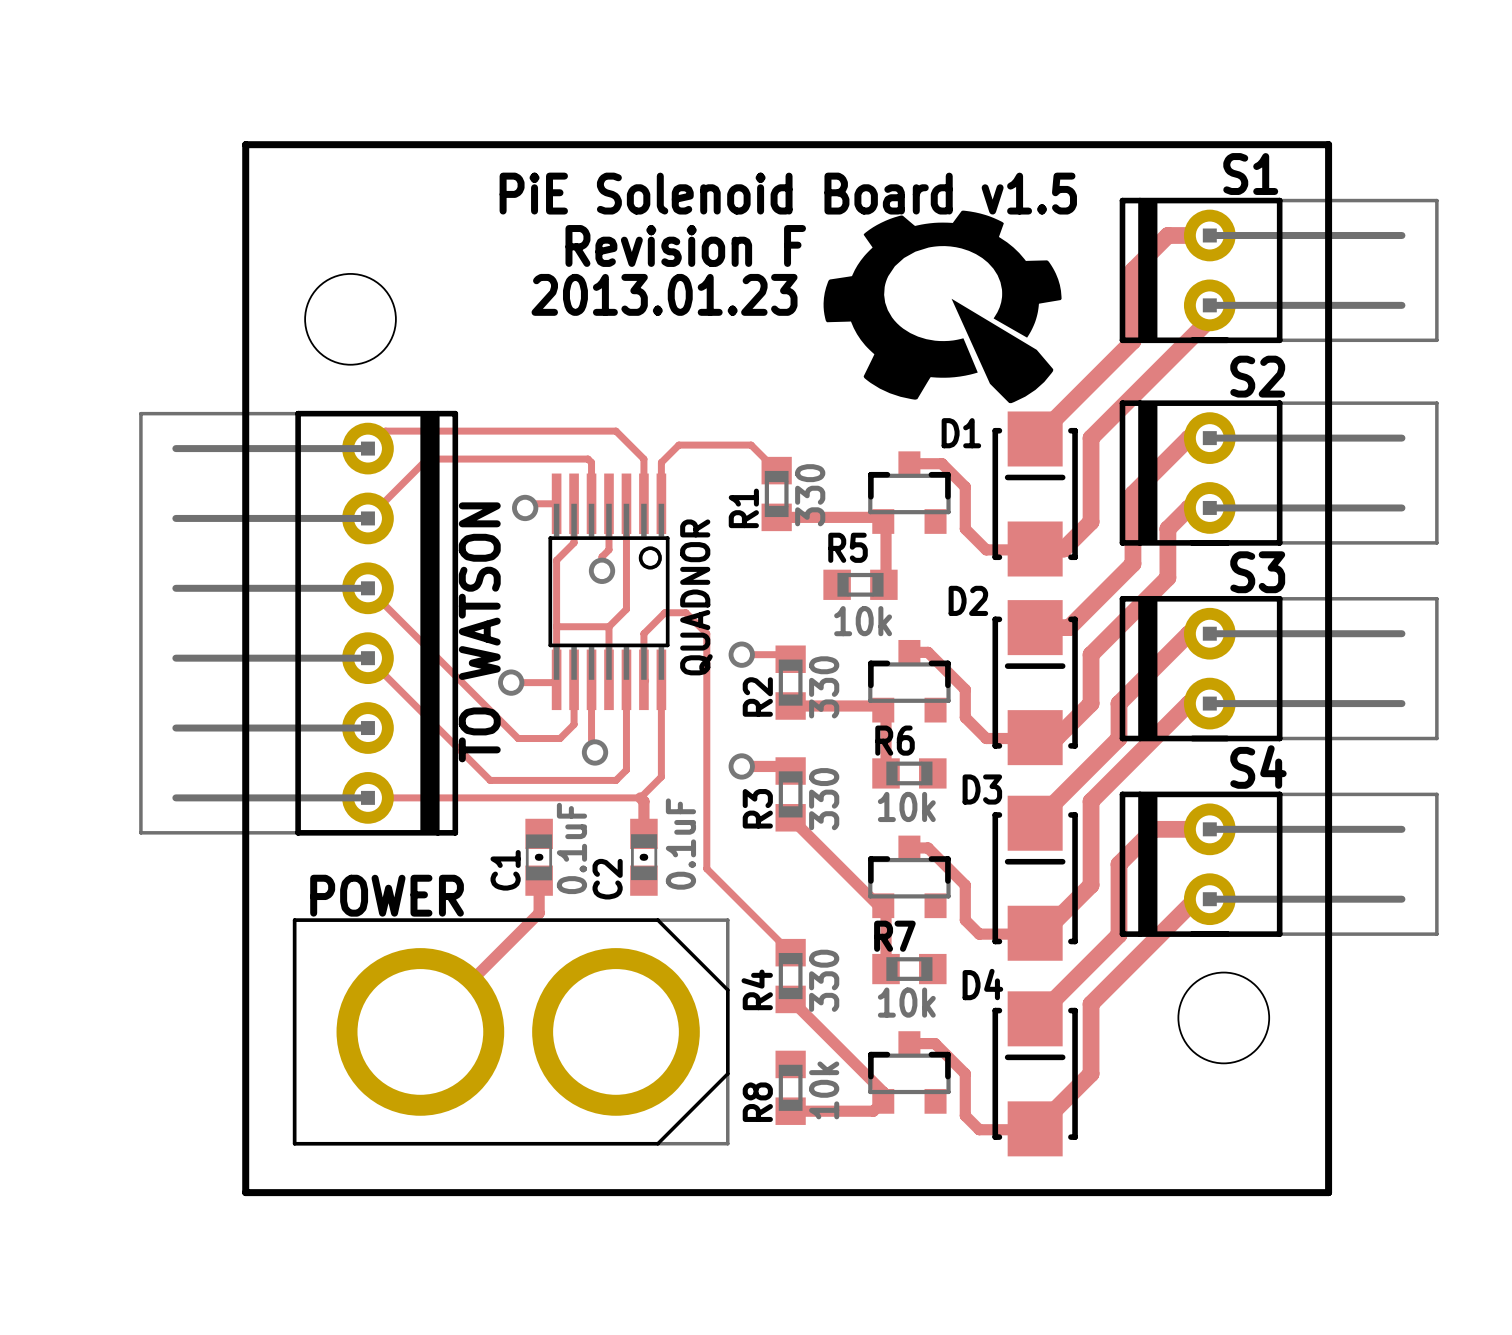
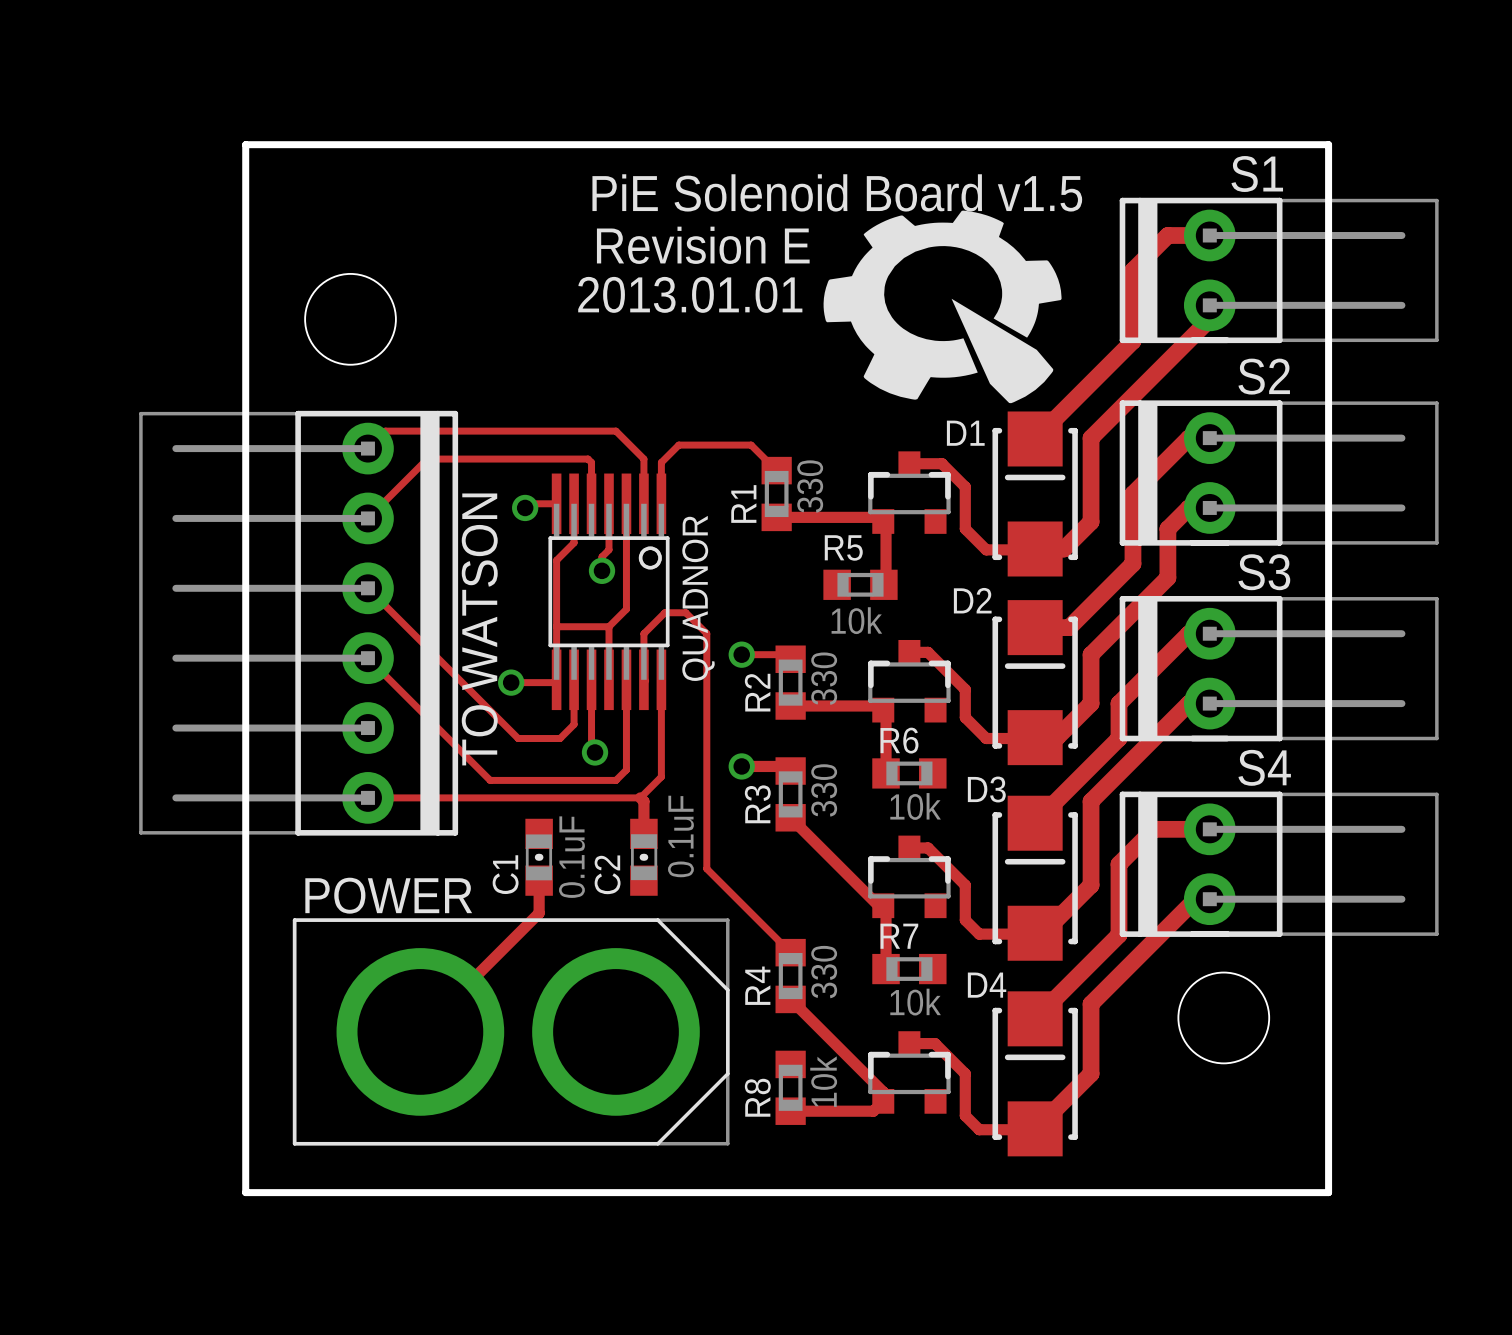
text: Revision F (685, 245) -> Revision E (703, 245)
text: 2013.01.23 (664, 294) -> 2013.01.01 (690, 294)

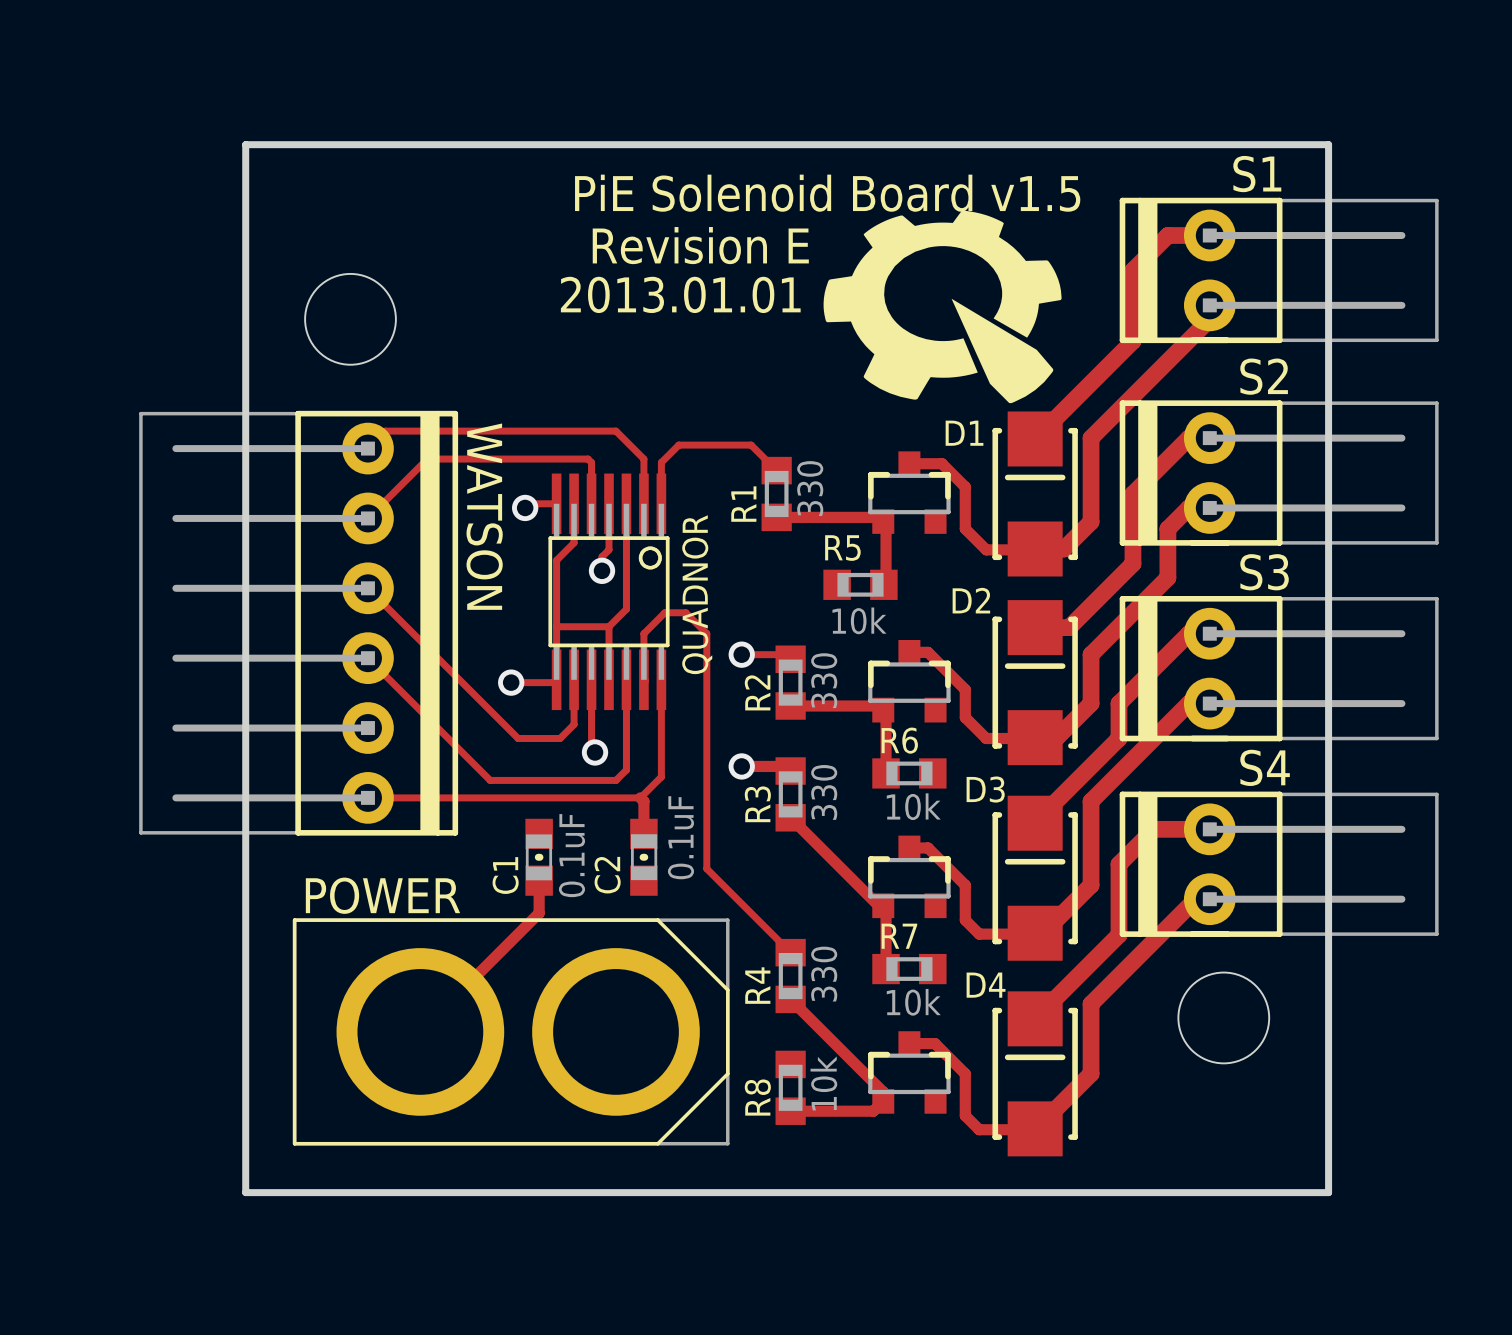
WATSON name: none -> WATSON (484, 516)
text: TO WATSON (479, 629) -> none

